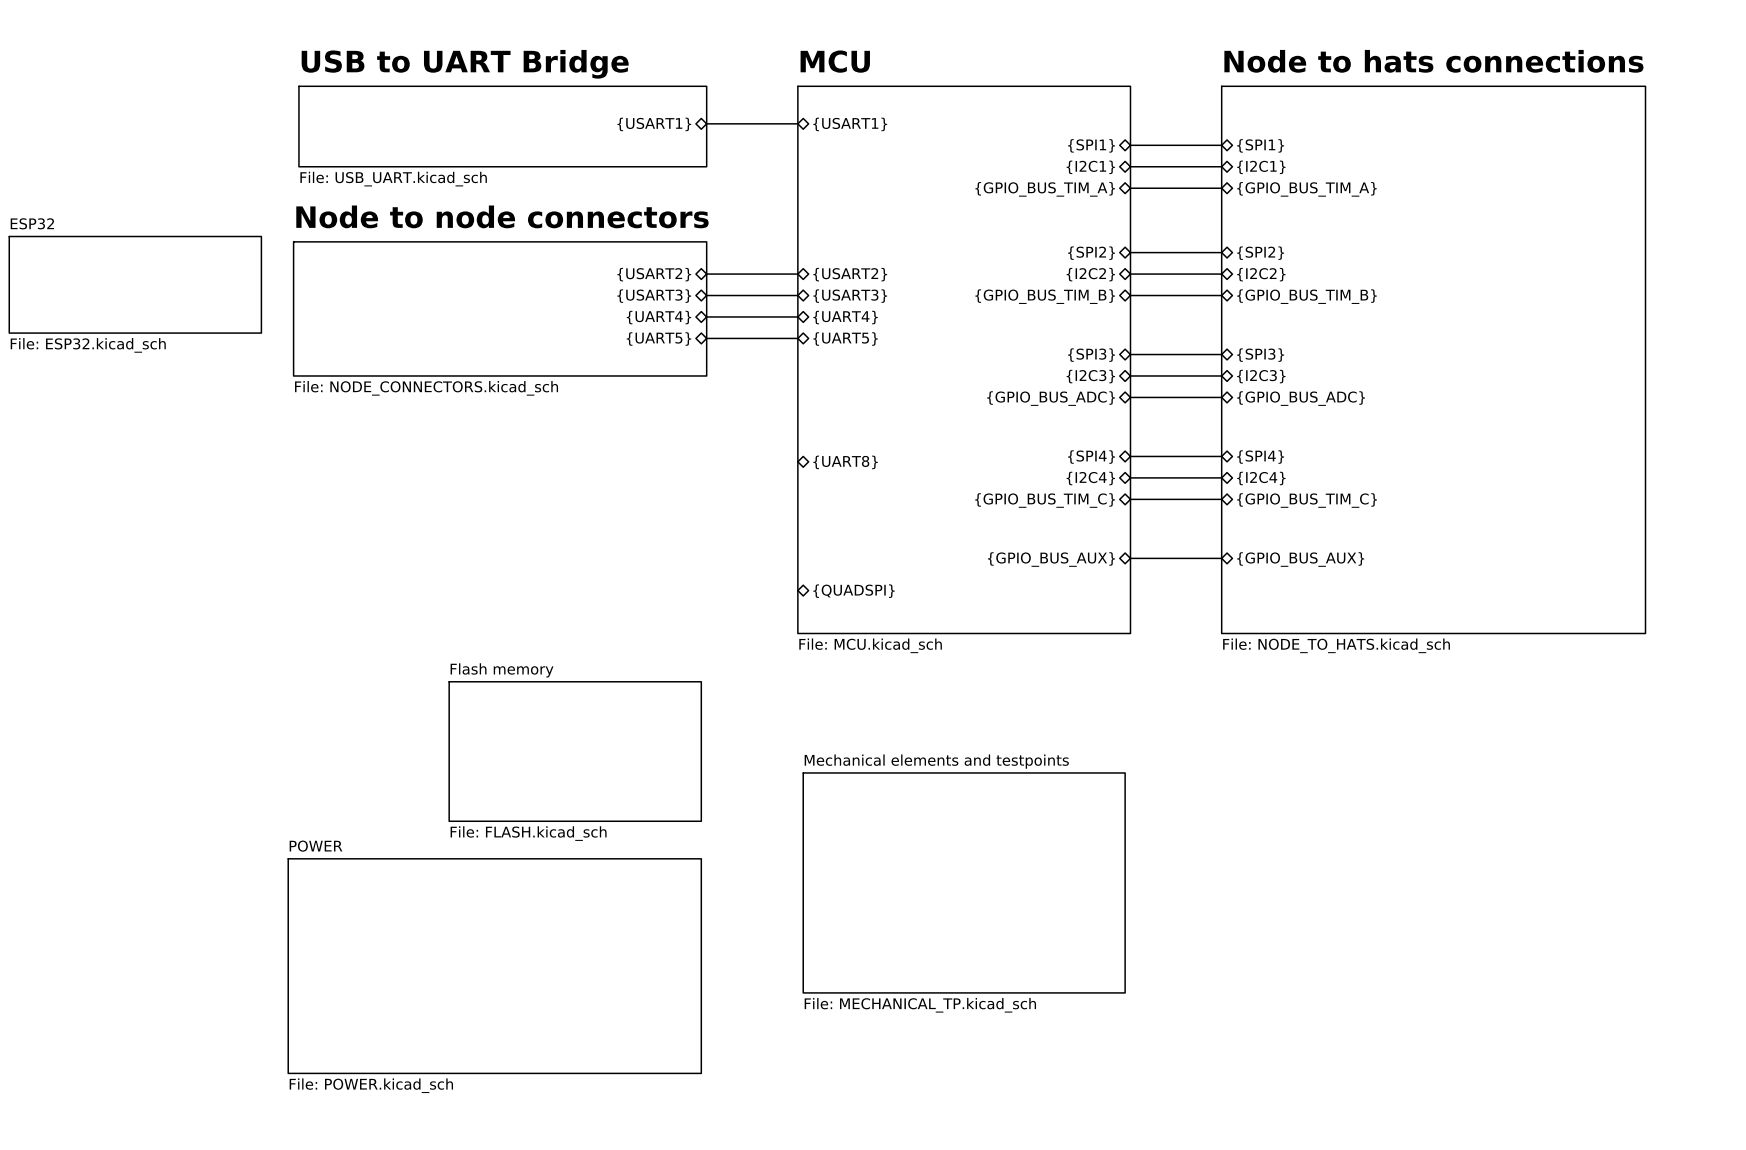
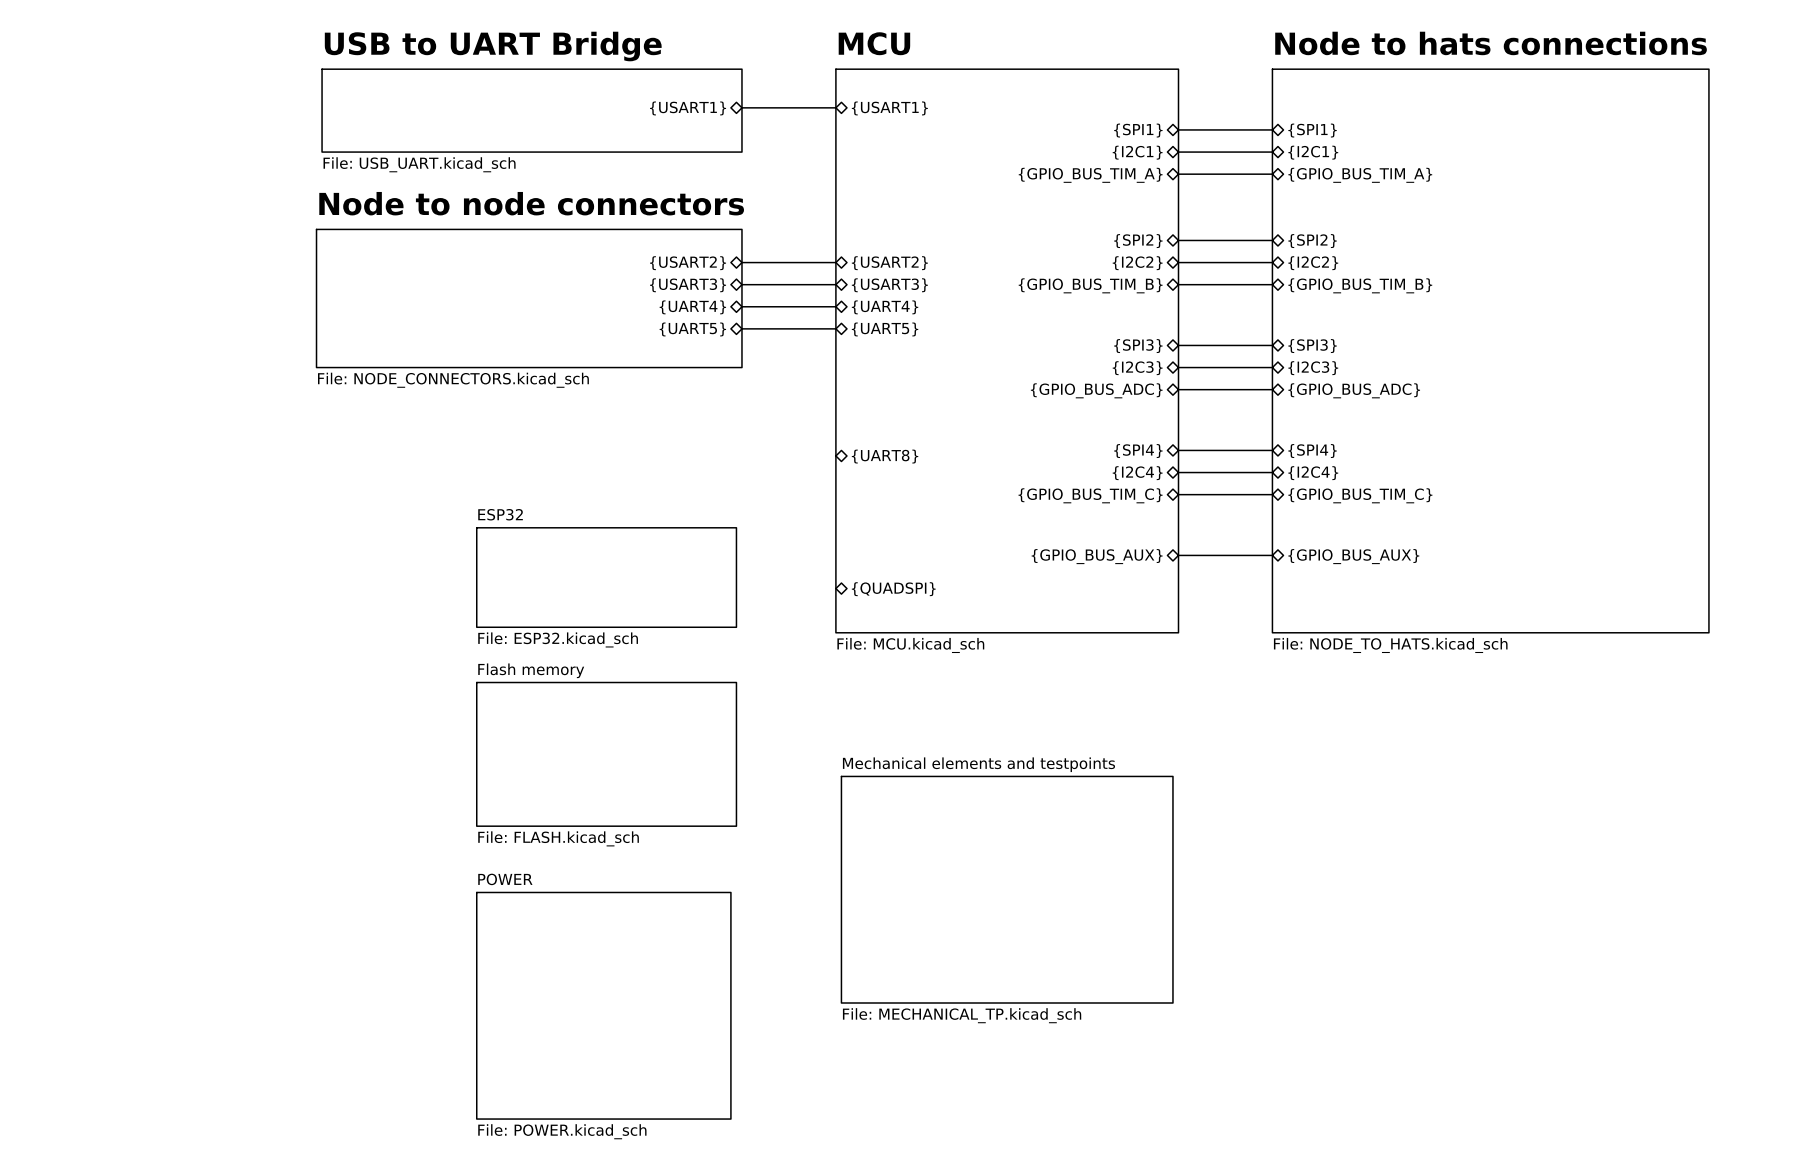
sheet ESP32 position: (135, 284) -> (606, 577)
sheet POWER: File: POWER.kicad_sch (494, 966) -> none
sheet POWER: none -> File: POWER.kicad_sch (603, 1005)

